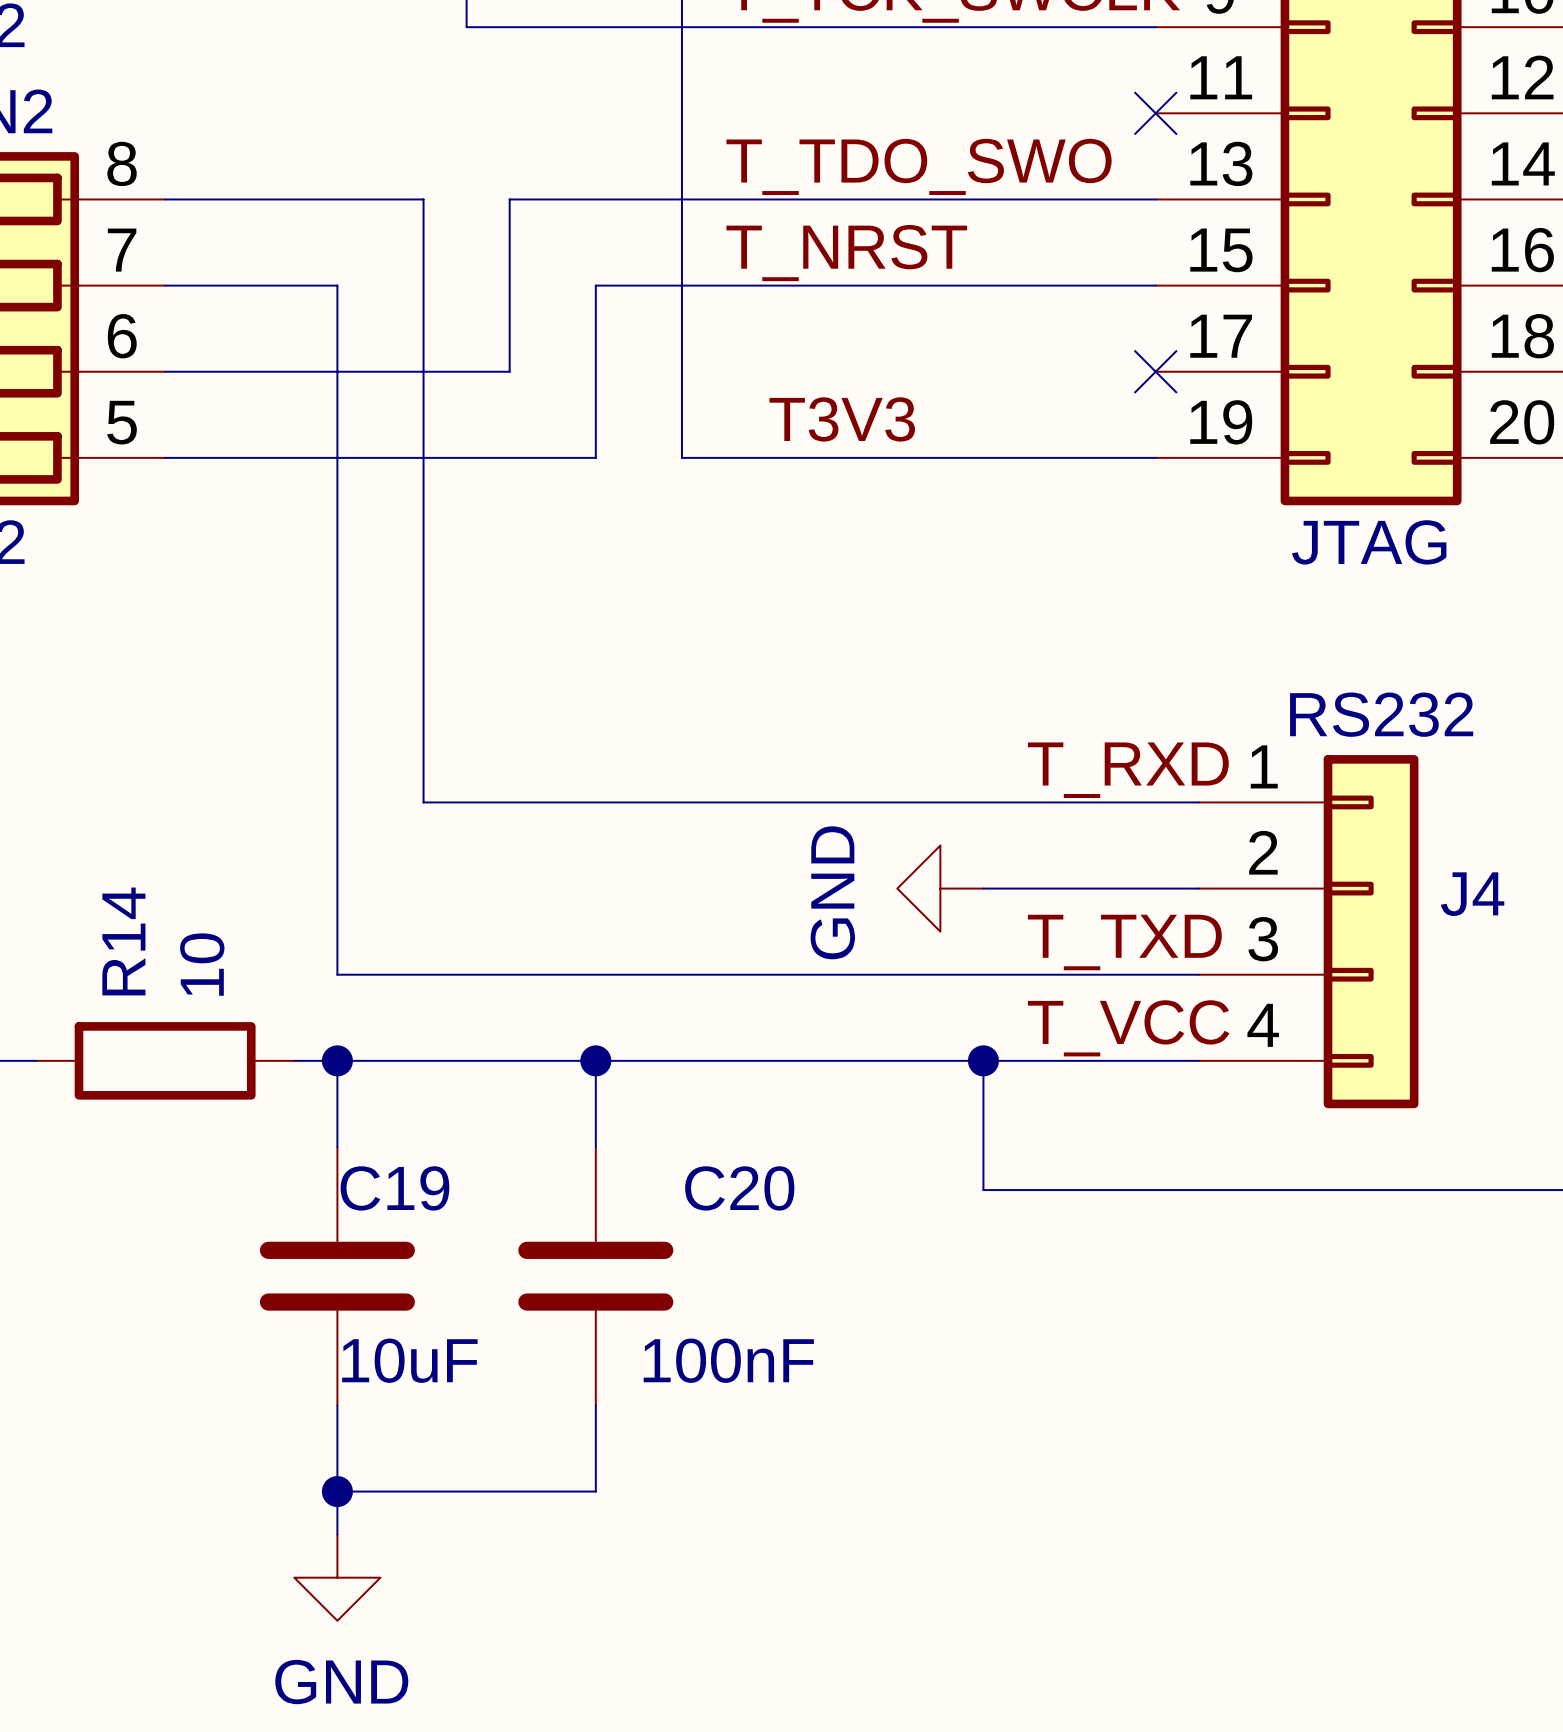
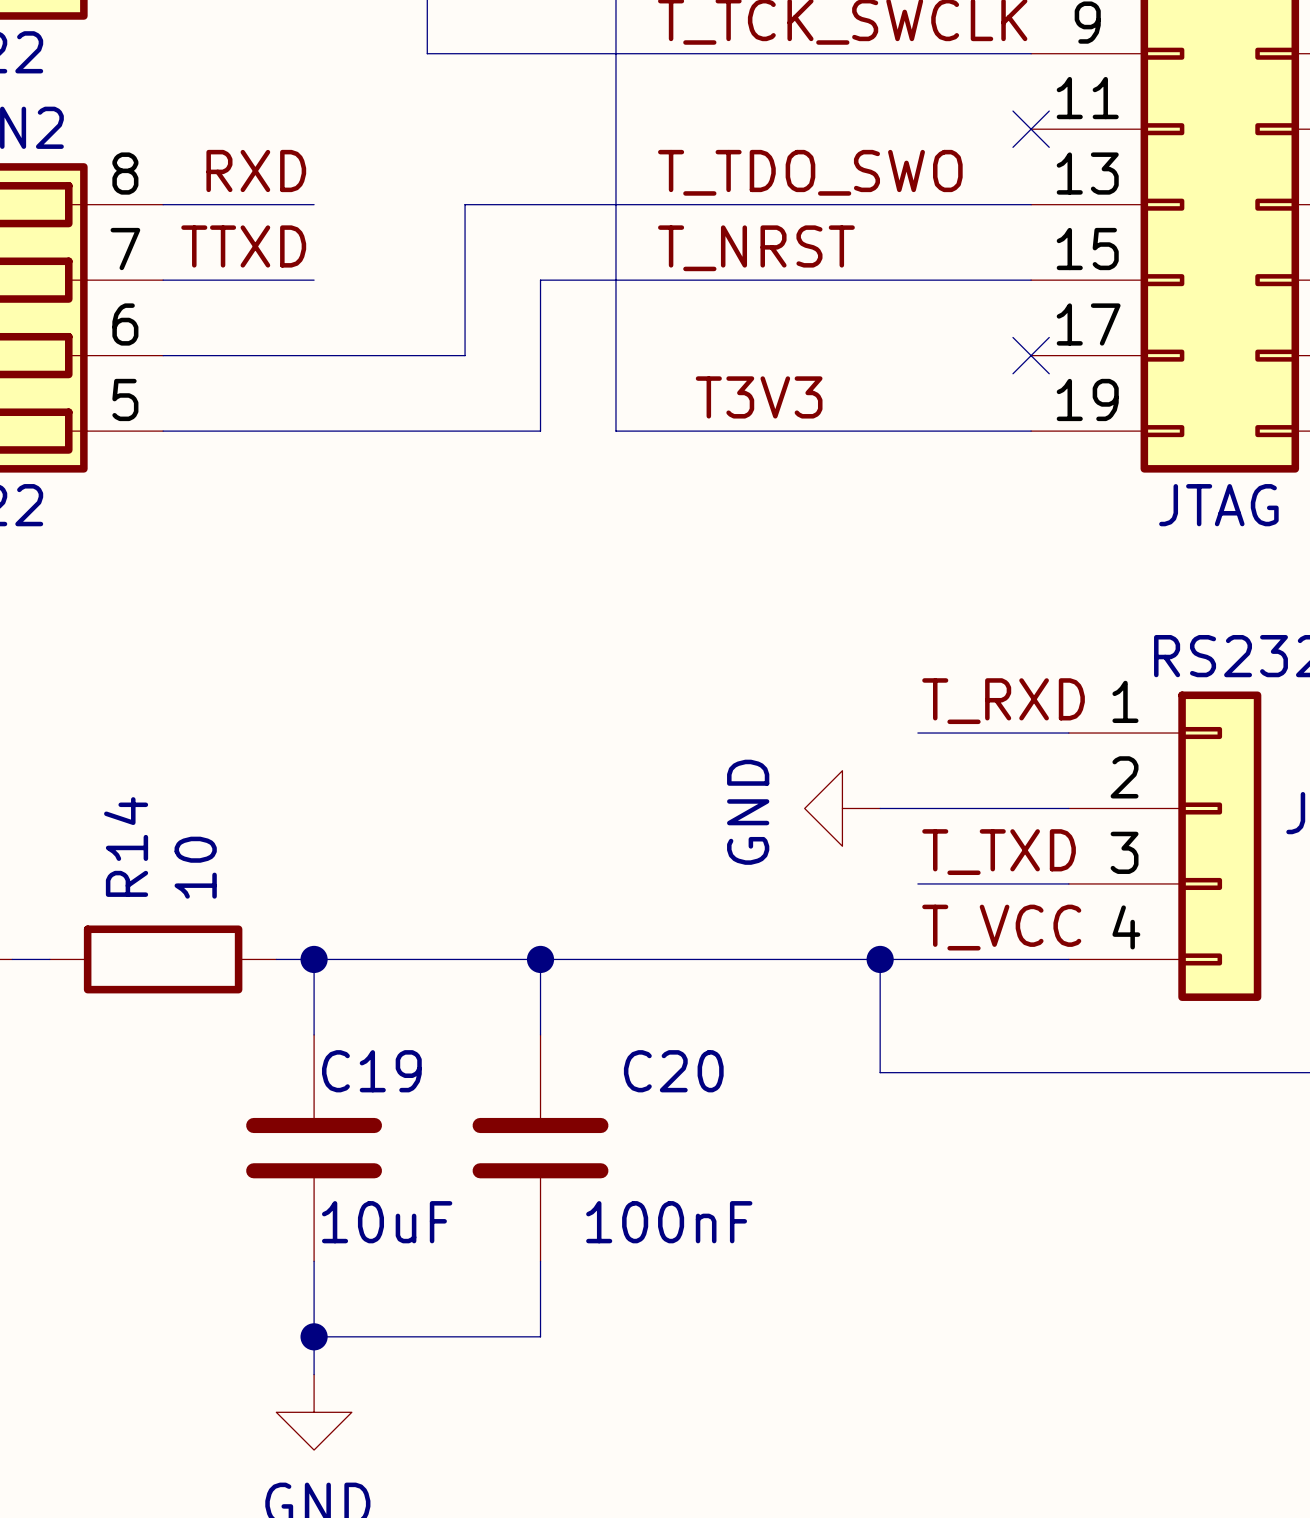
label: none -> RXD (256, 170)
wire: (337, 199) (423, 199) (423, 802) (1026, 802) -> none
label: none -> TTXD (243, 246)
wire: (337, 285) (337, 974) (1026, 974) -> none

